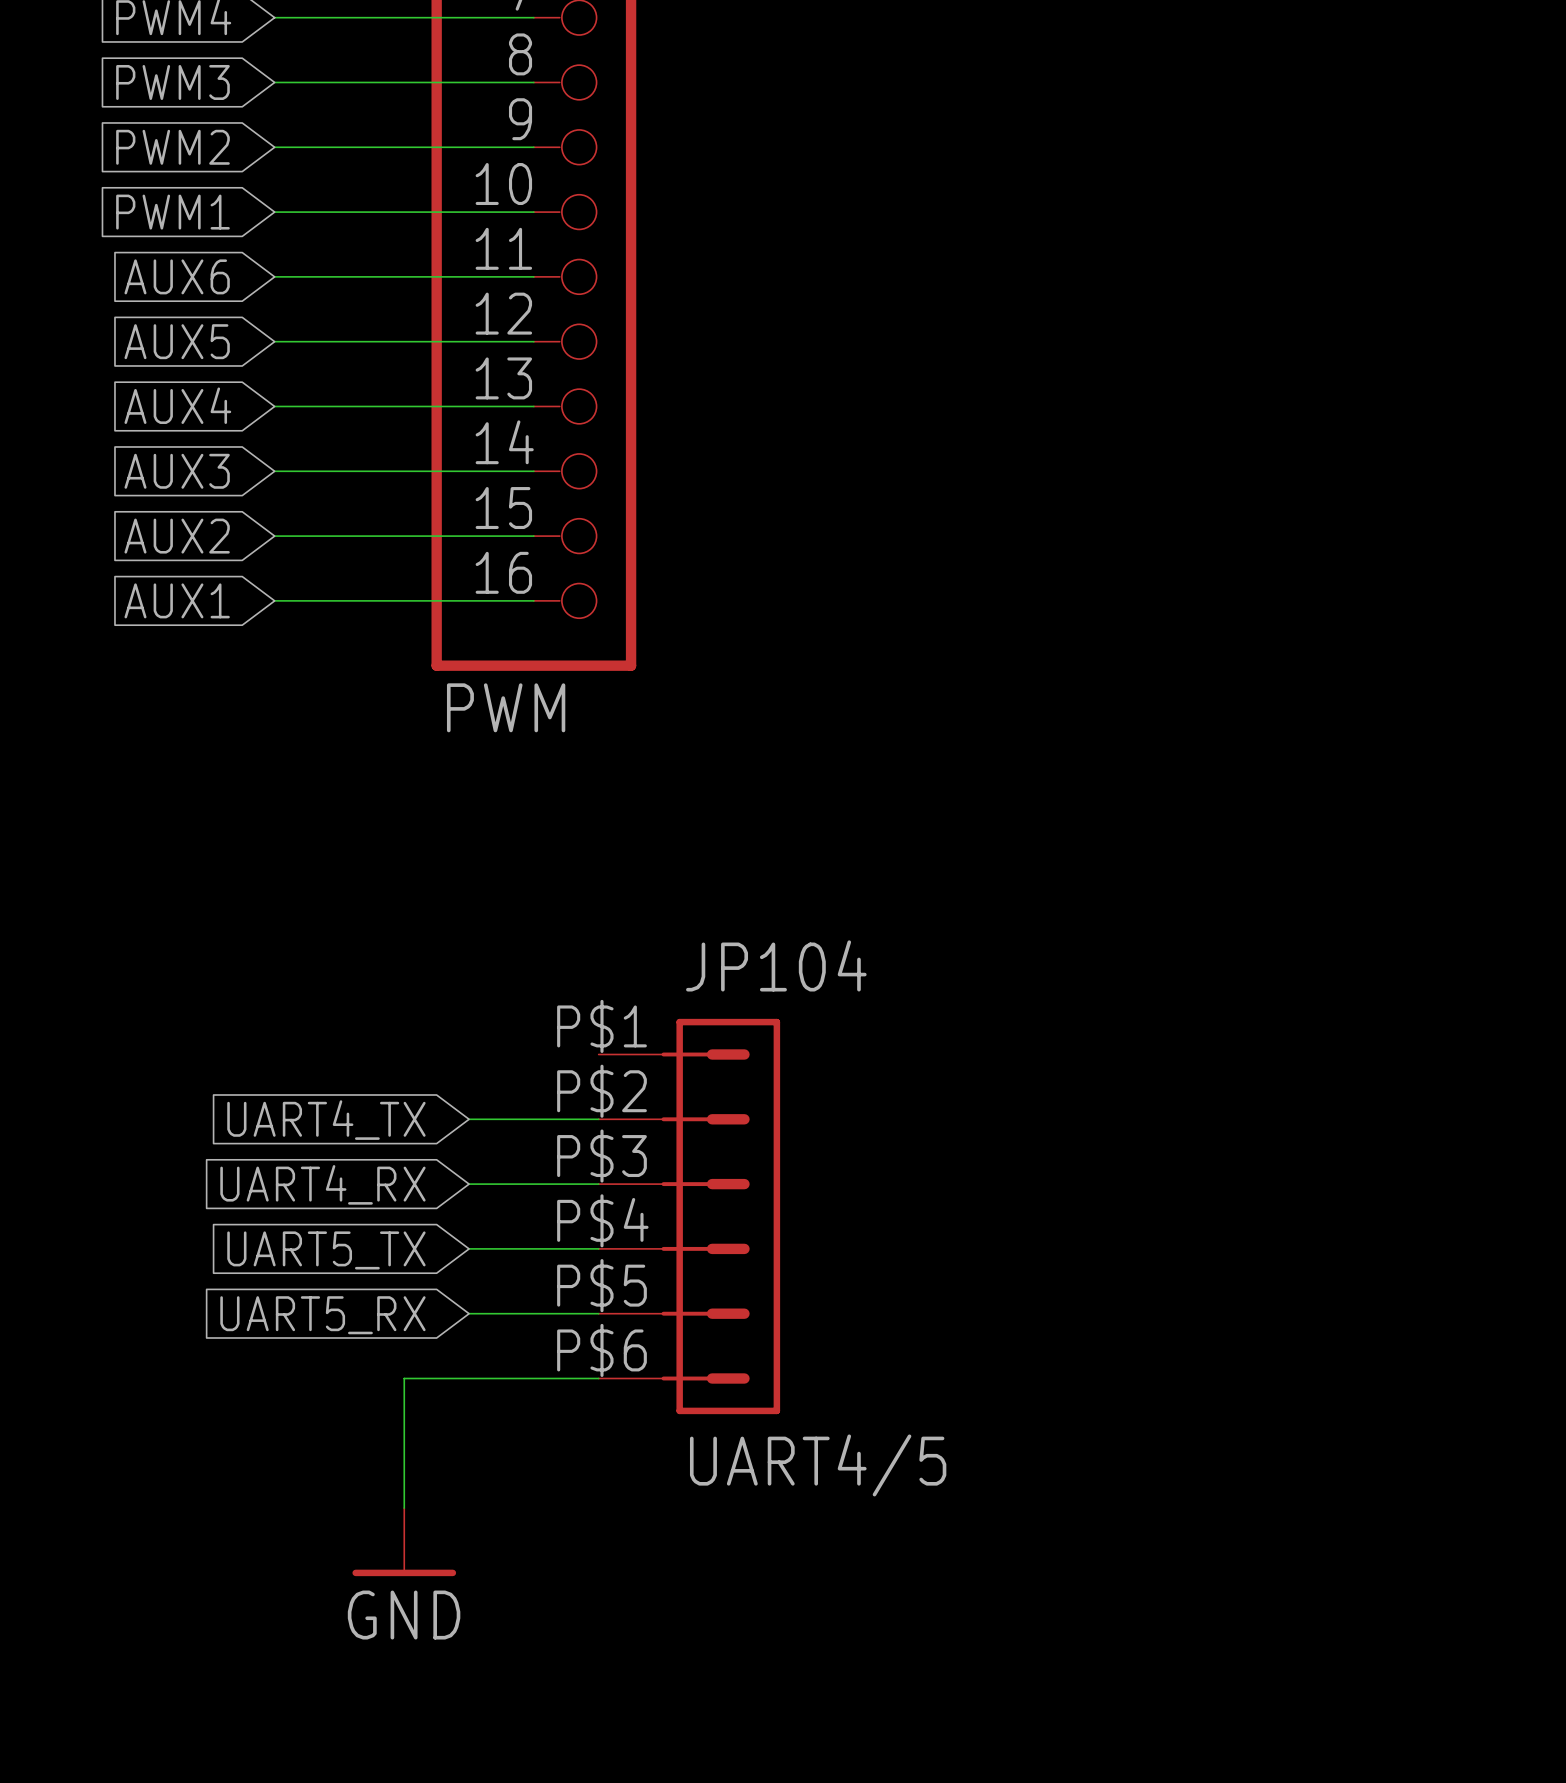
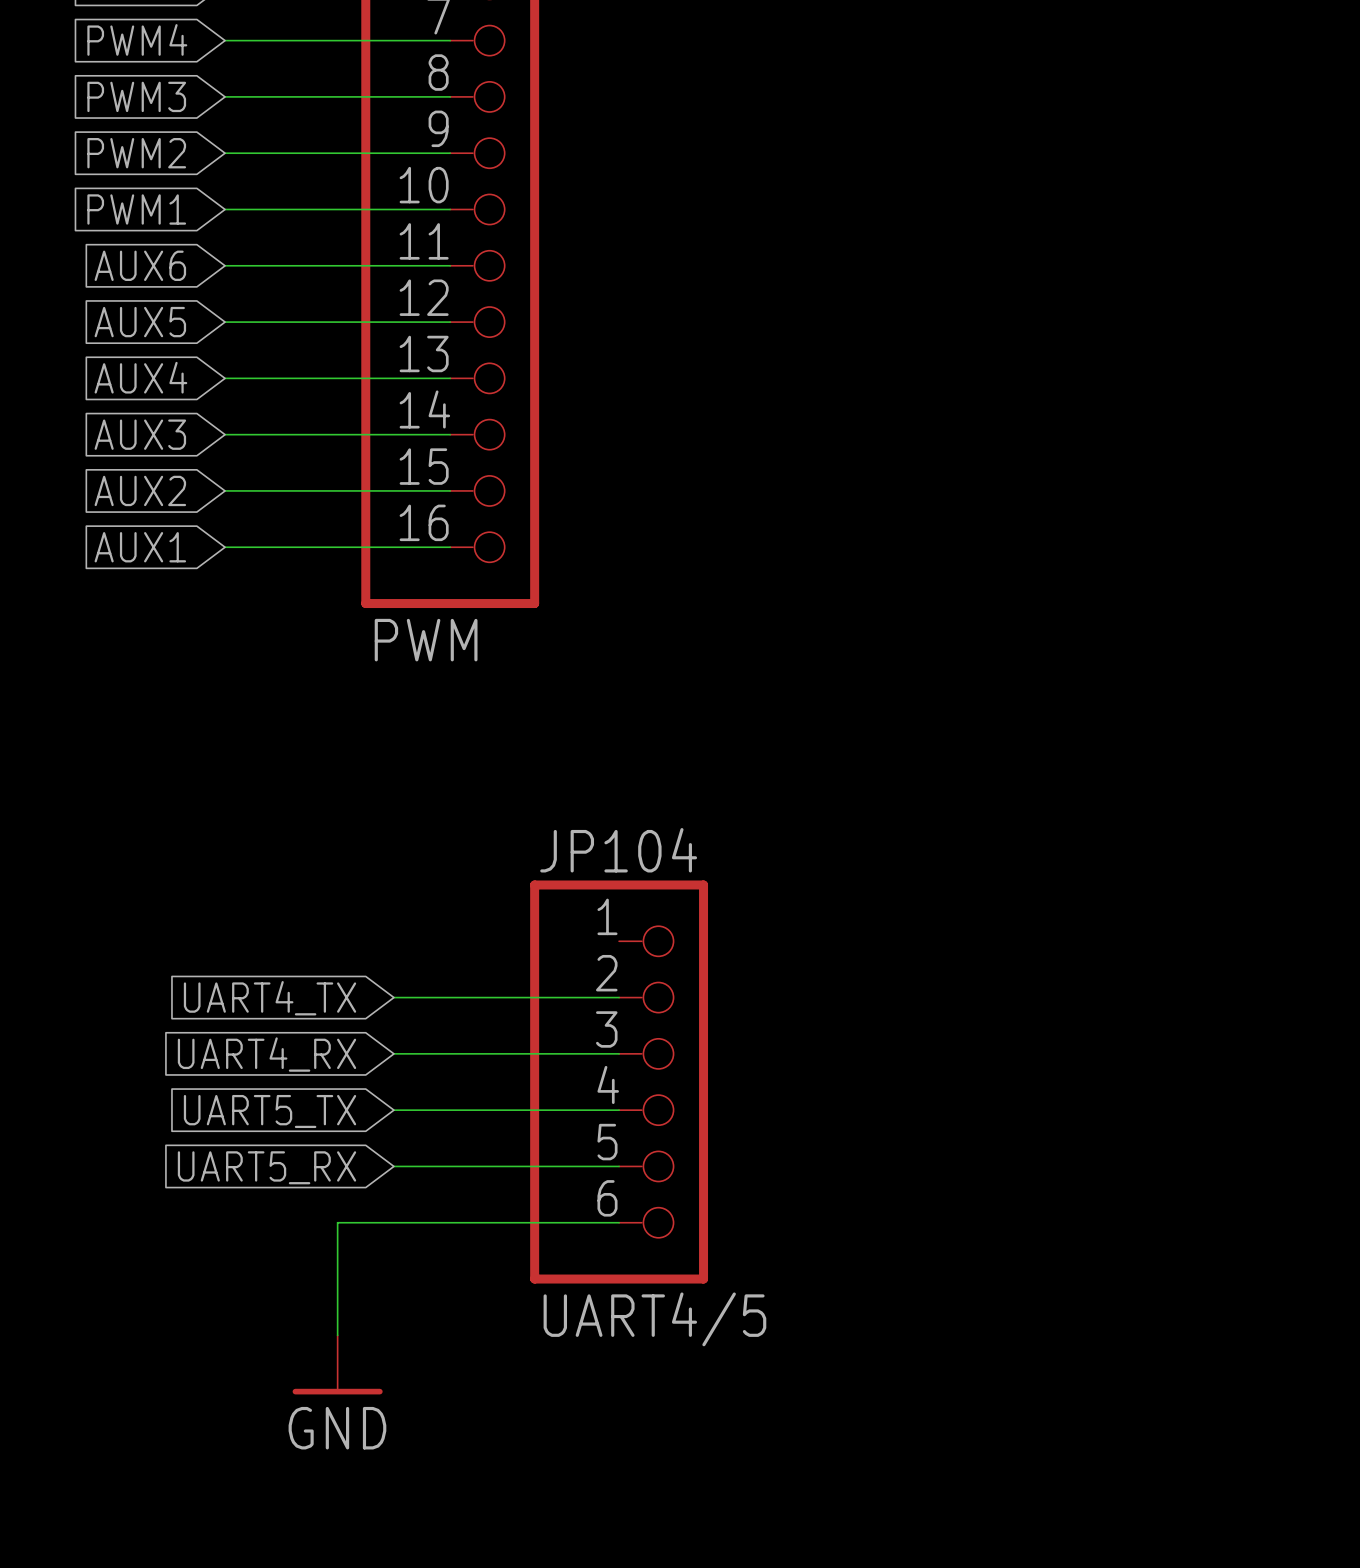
JP104 name position: JP104 (776, 965) -> JP104 (618, 850)
JP104 symbol: [598, 1018, 781, 1415] -> [530, 880, 709, 1284]
JP104 value position: UART4/5 (818, 1465) -> UART4/5 (654, 1319)

